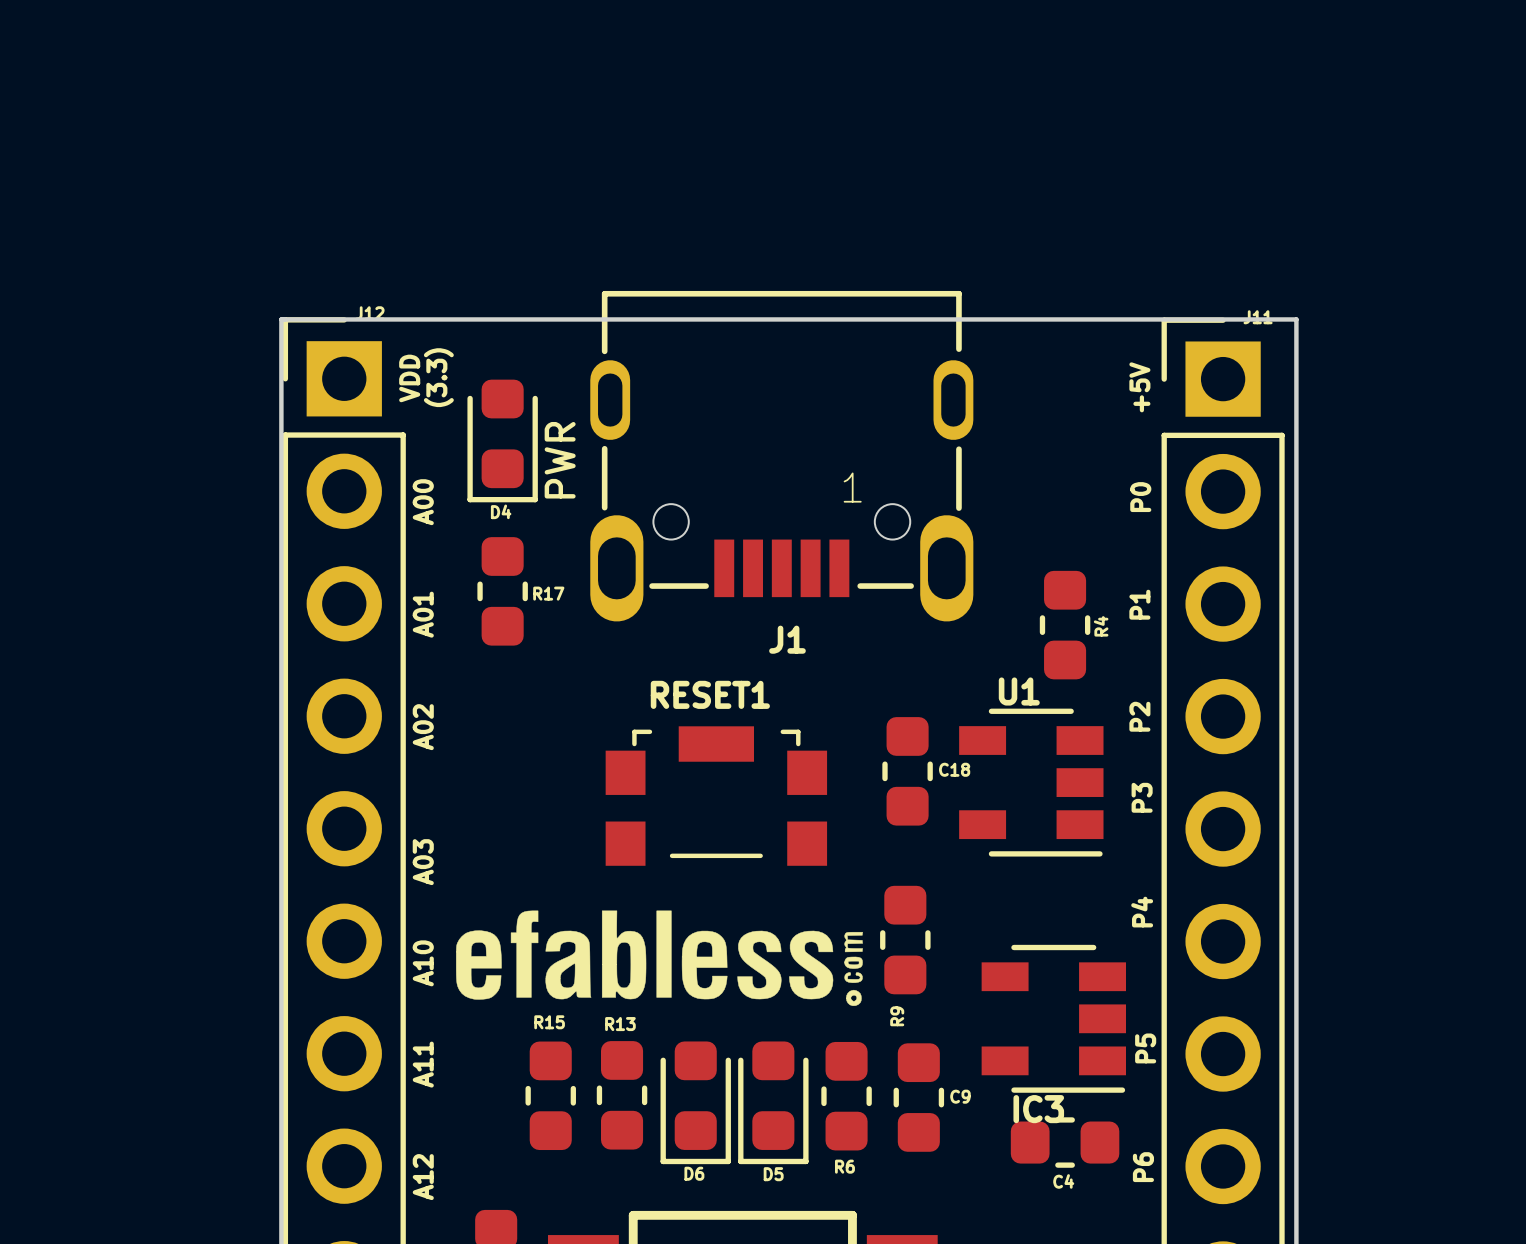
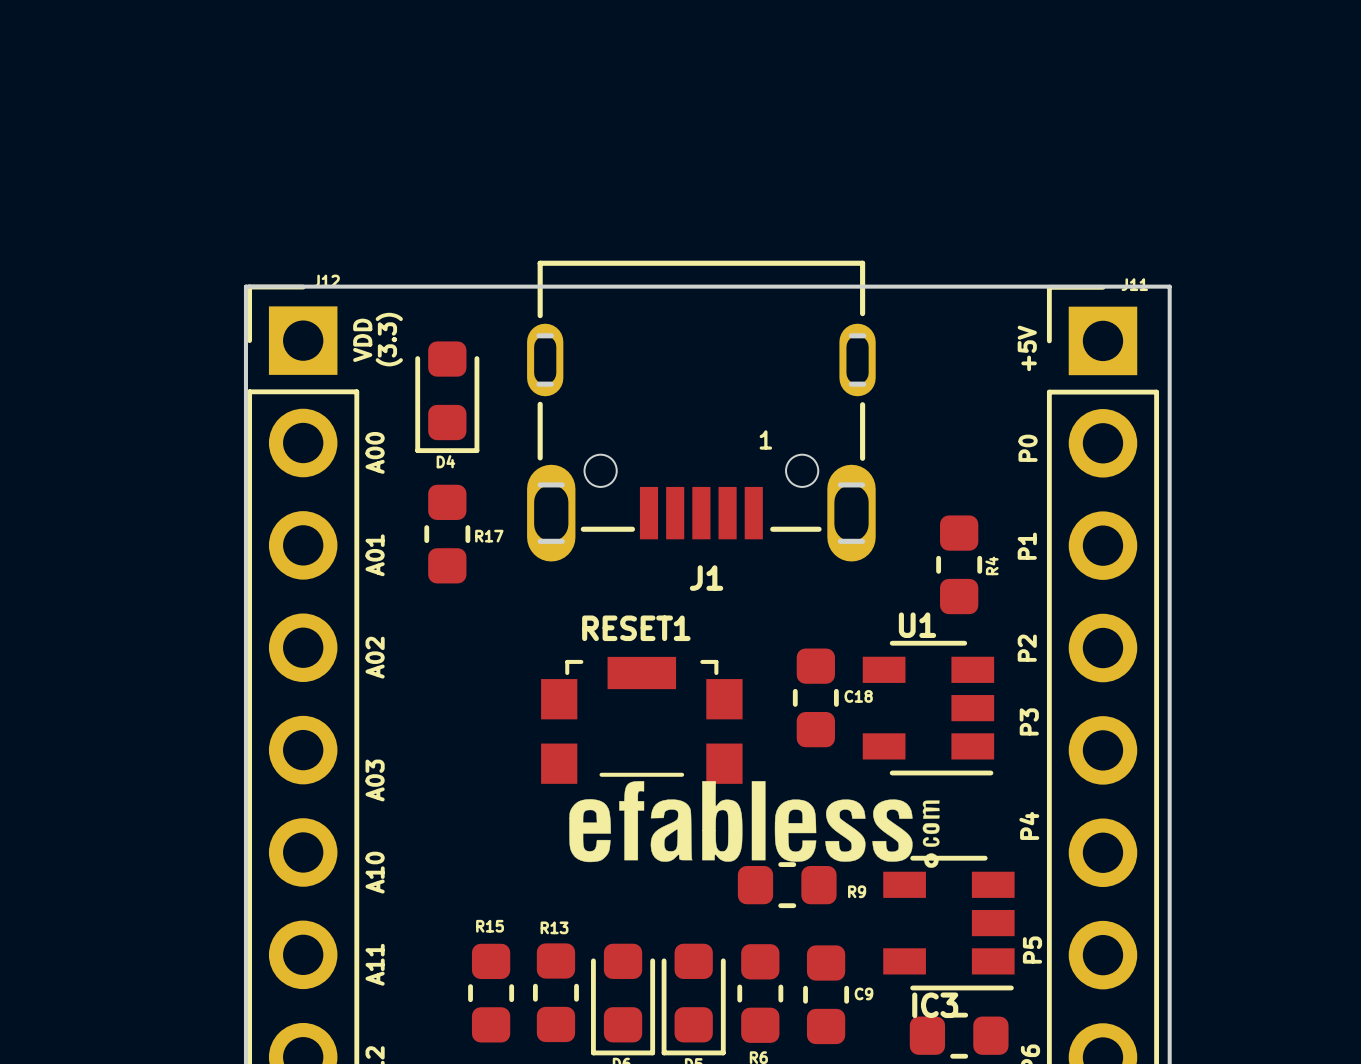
J1 footprint: [590, 290, 974, 622] -> [527, 260, 876, 562]
text: PWR (560, 460) -> none
R9 rotation: 0° (905, 940) -> 90° clockwise (787, 885)
drawing position: (659, 958) -> (754, 824)
R9 name position: R9 (897, 1016) -> R9 (857, 891)

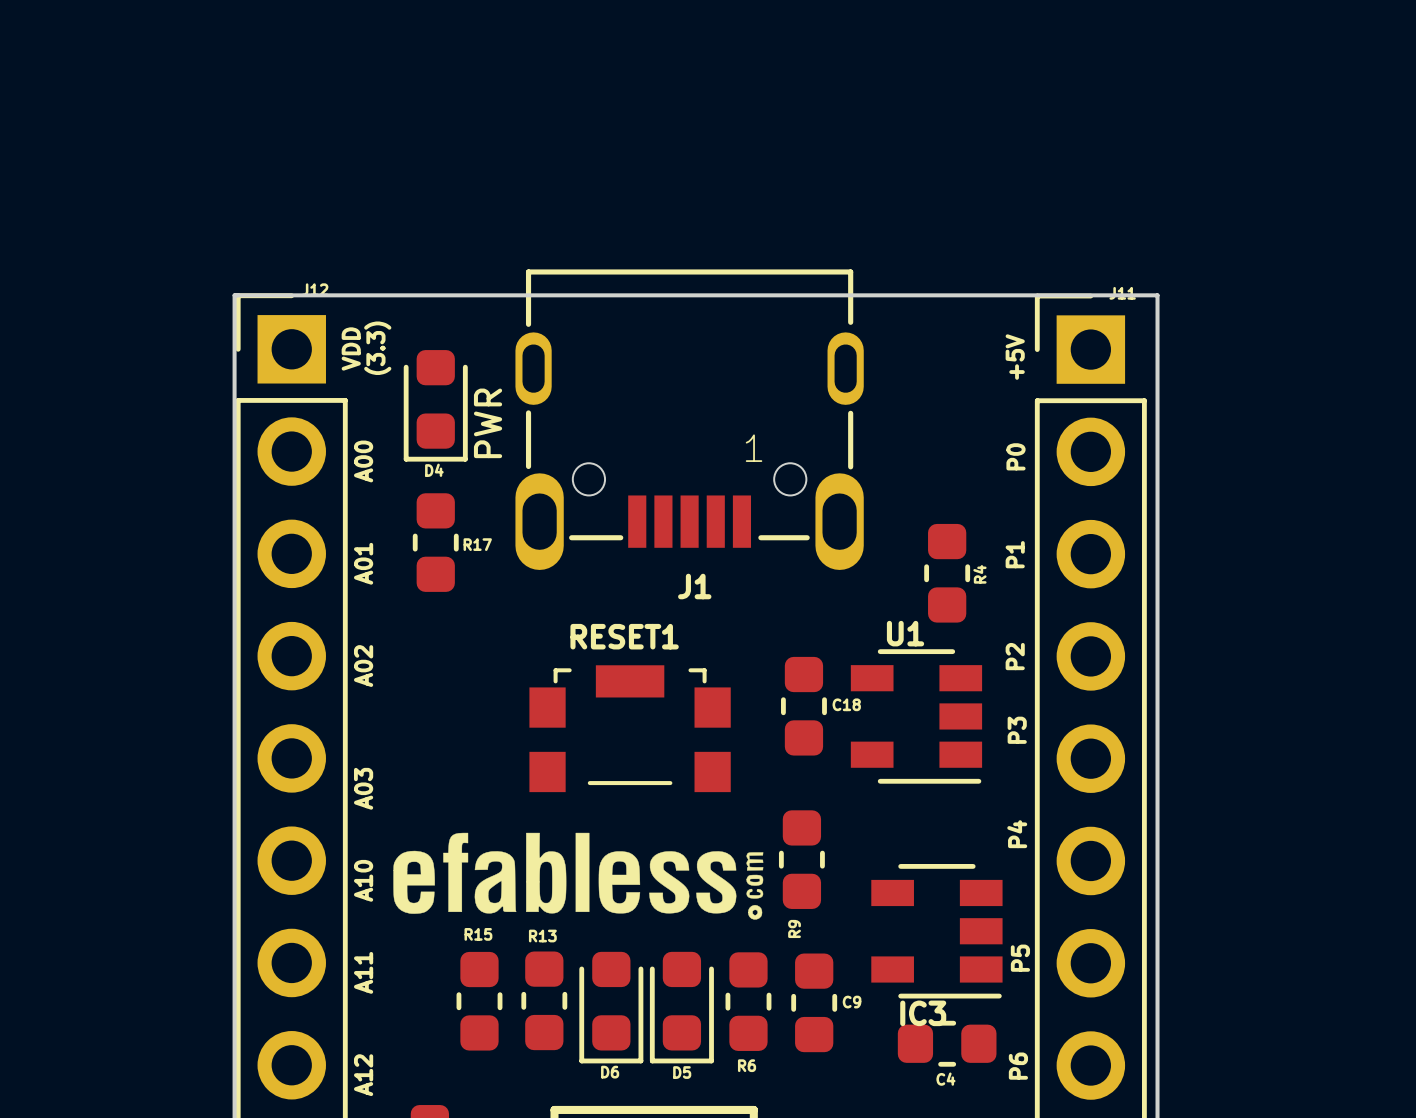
J1 footprint: [527, 260, 876, 562] -> [515, 269, 864, 570]
text: none -> PWR (488, 423)
drawing position: (754, 824) -> (578, 876)
R9 rotation: 0° (787, 885) -> 90° clockwise (801, 859)

